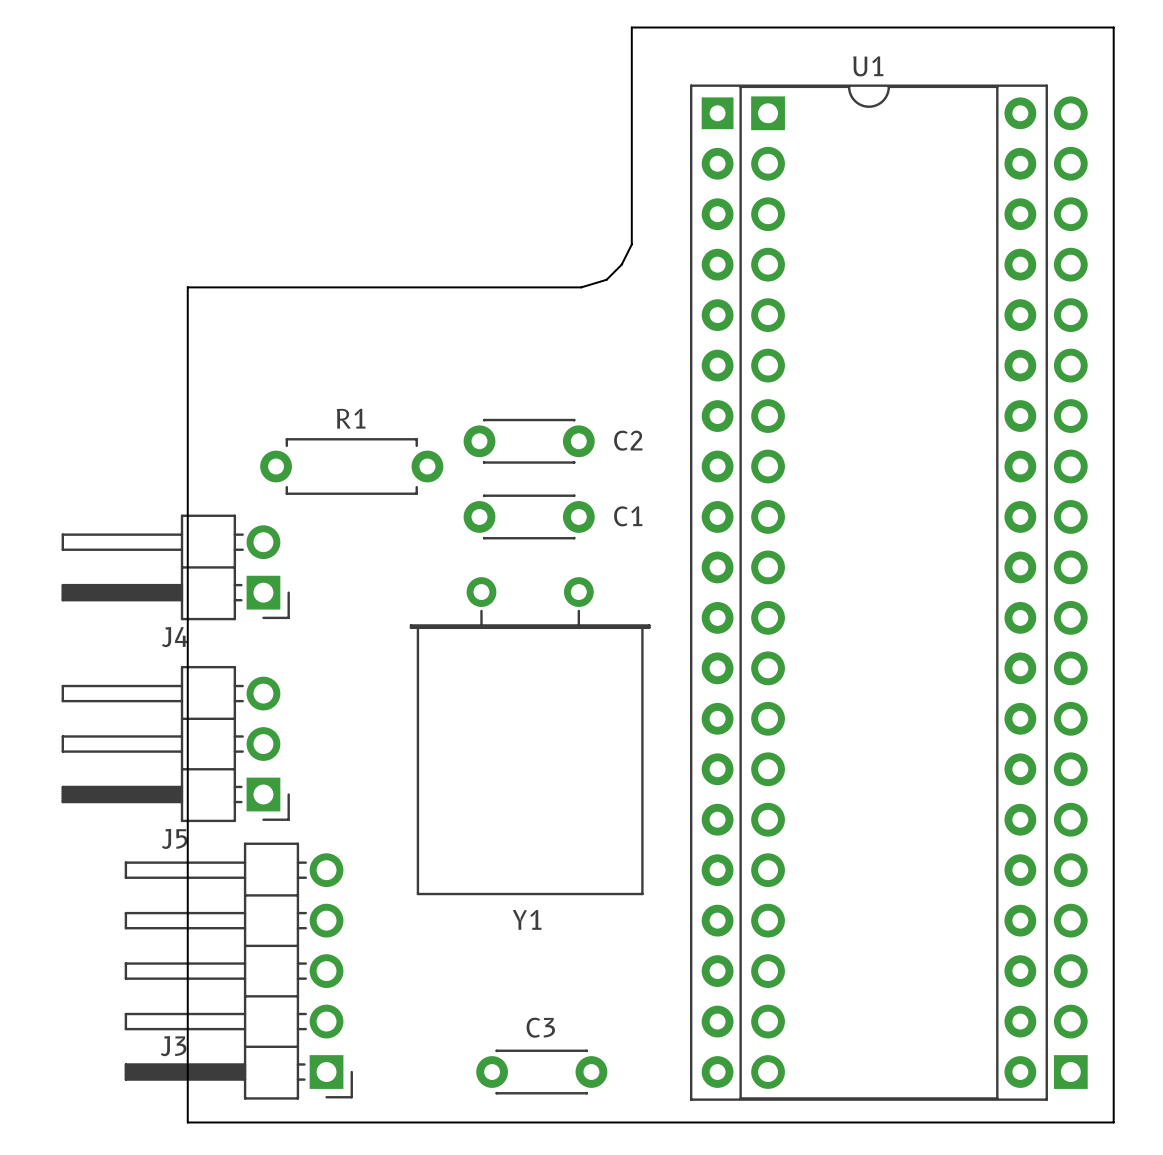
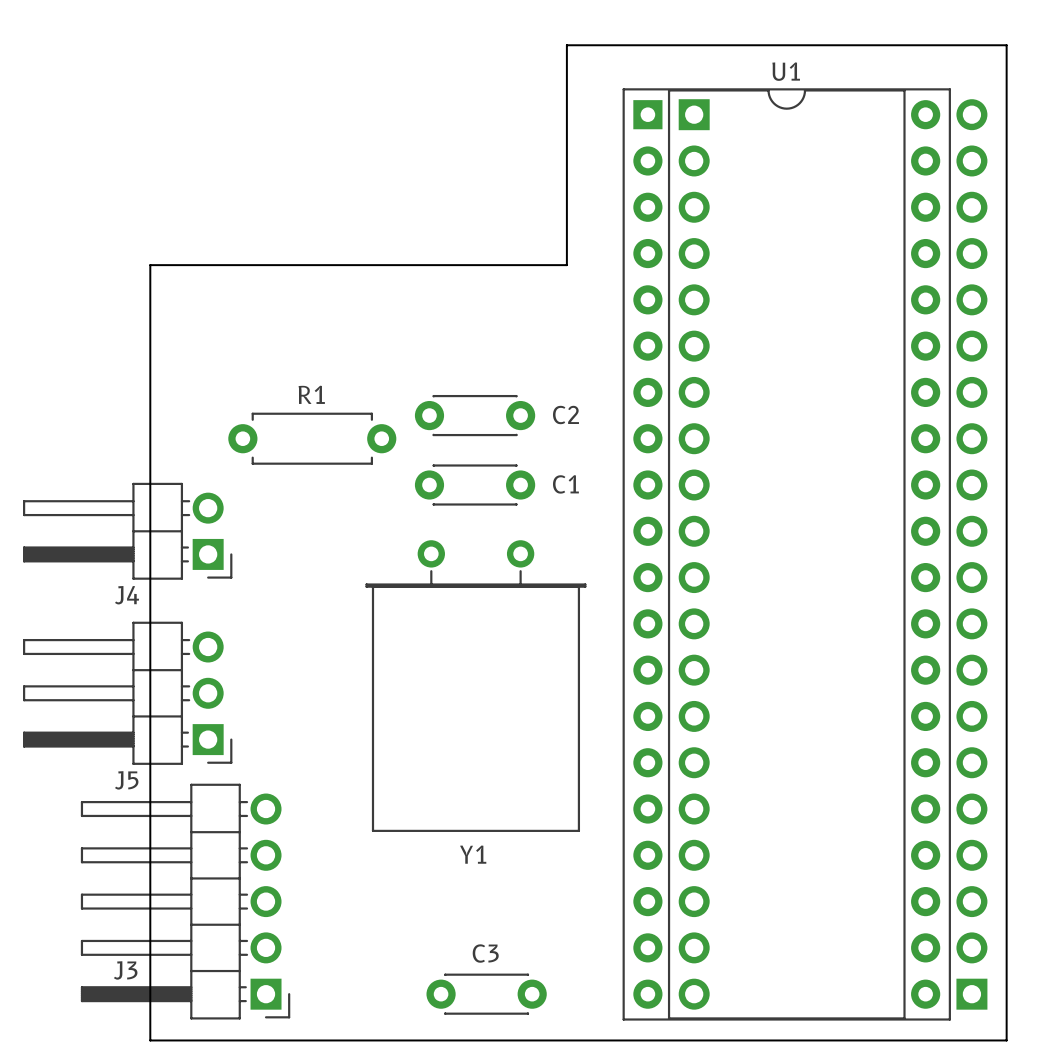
J4 position: (175, 567) -> (127, 531)
J5 position: (175, 744) -> (127, 693)
J3 position: (238, 971) -> (185, 901)
board edge: (187, 1122) (187, 287) (581, 287) (606, 279) (621, 264) (631, 244) (631, 27) (1113, 27) (1113, 1122) (1108, 1122) -> (161, 1040) (150, 1040) (150, 265) (566, 265) (566, 45) (1006, 45) (1006, 1040)

